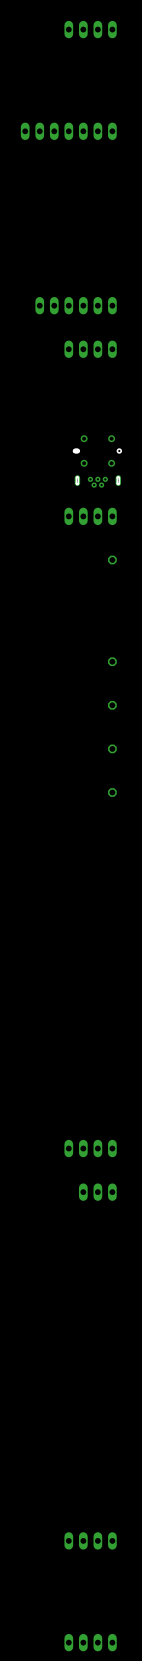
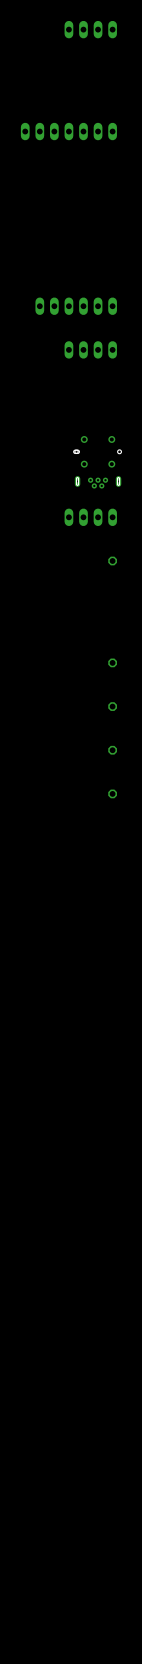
part: (90, 1148) -> none
part: (97, 1192) -> none
part: (90, 1540) -> none
part: (90, 1642) -> none

